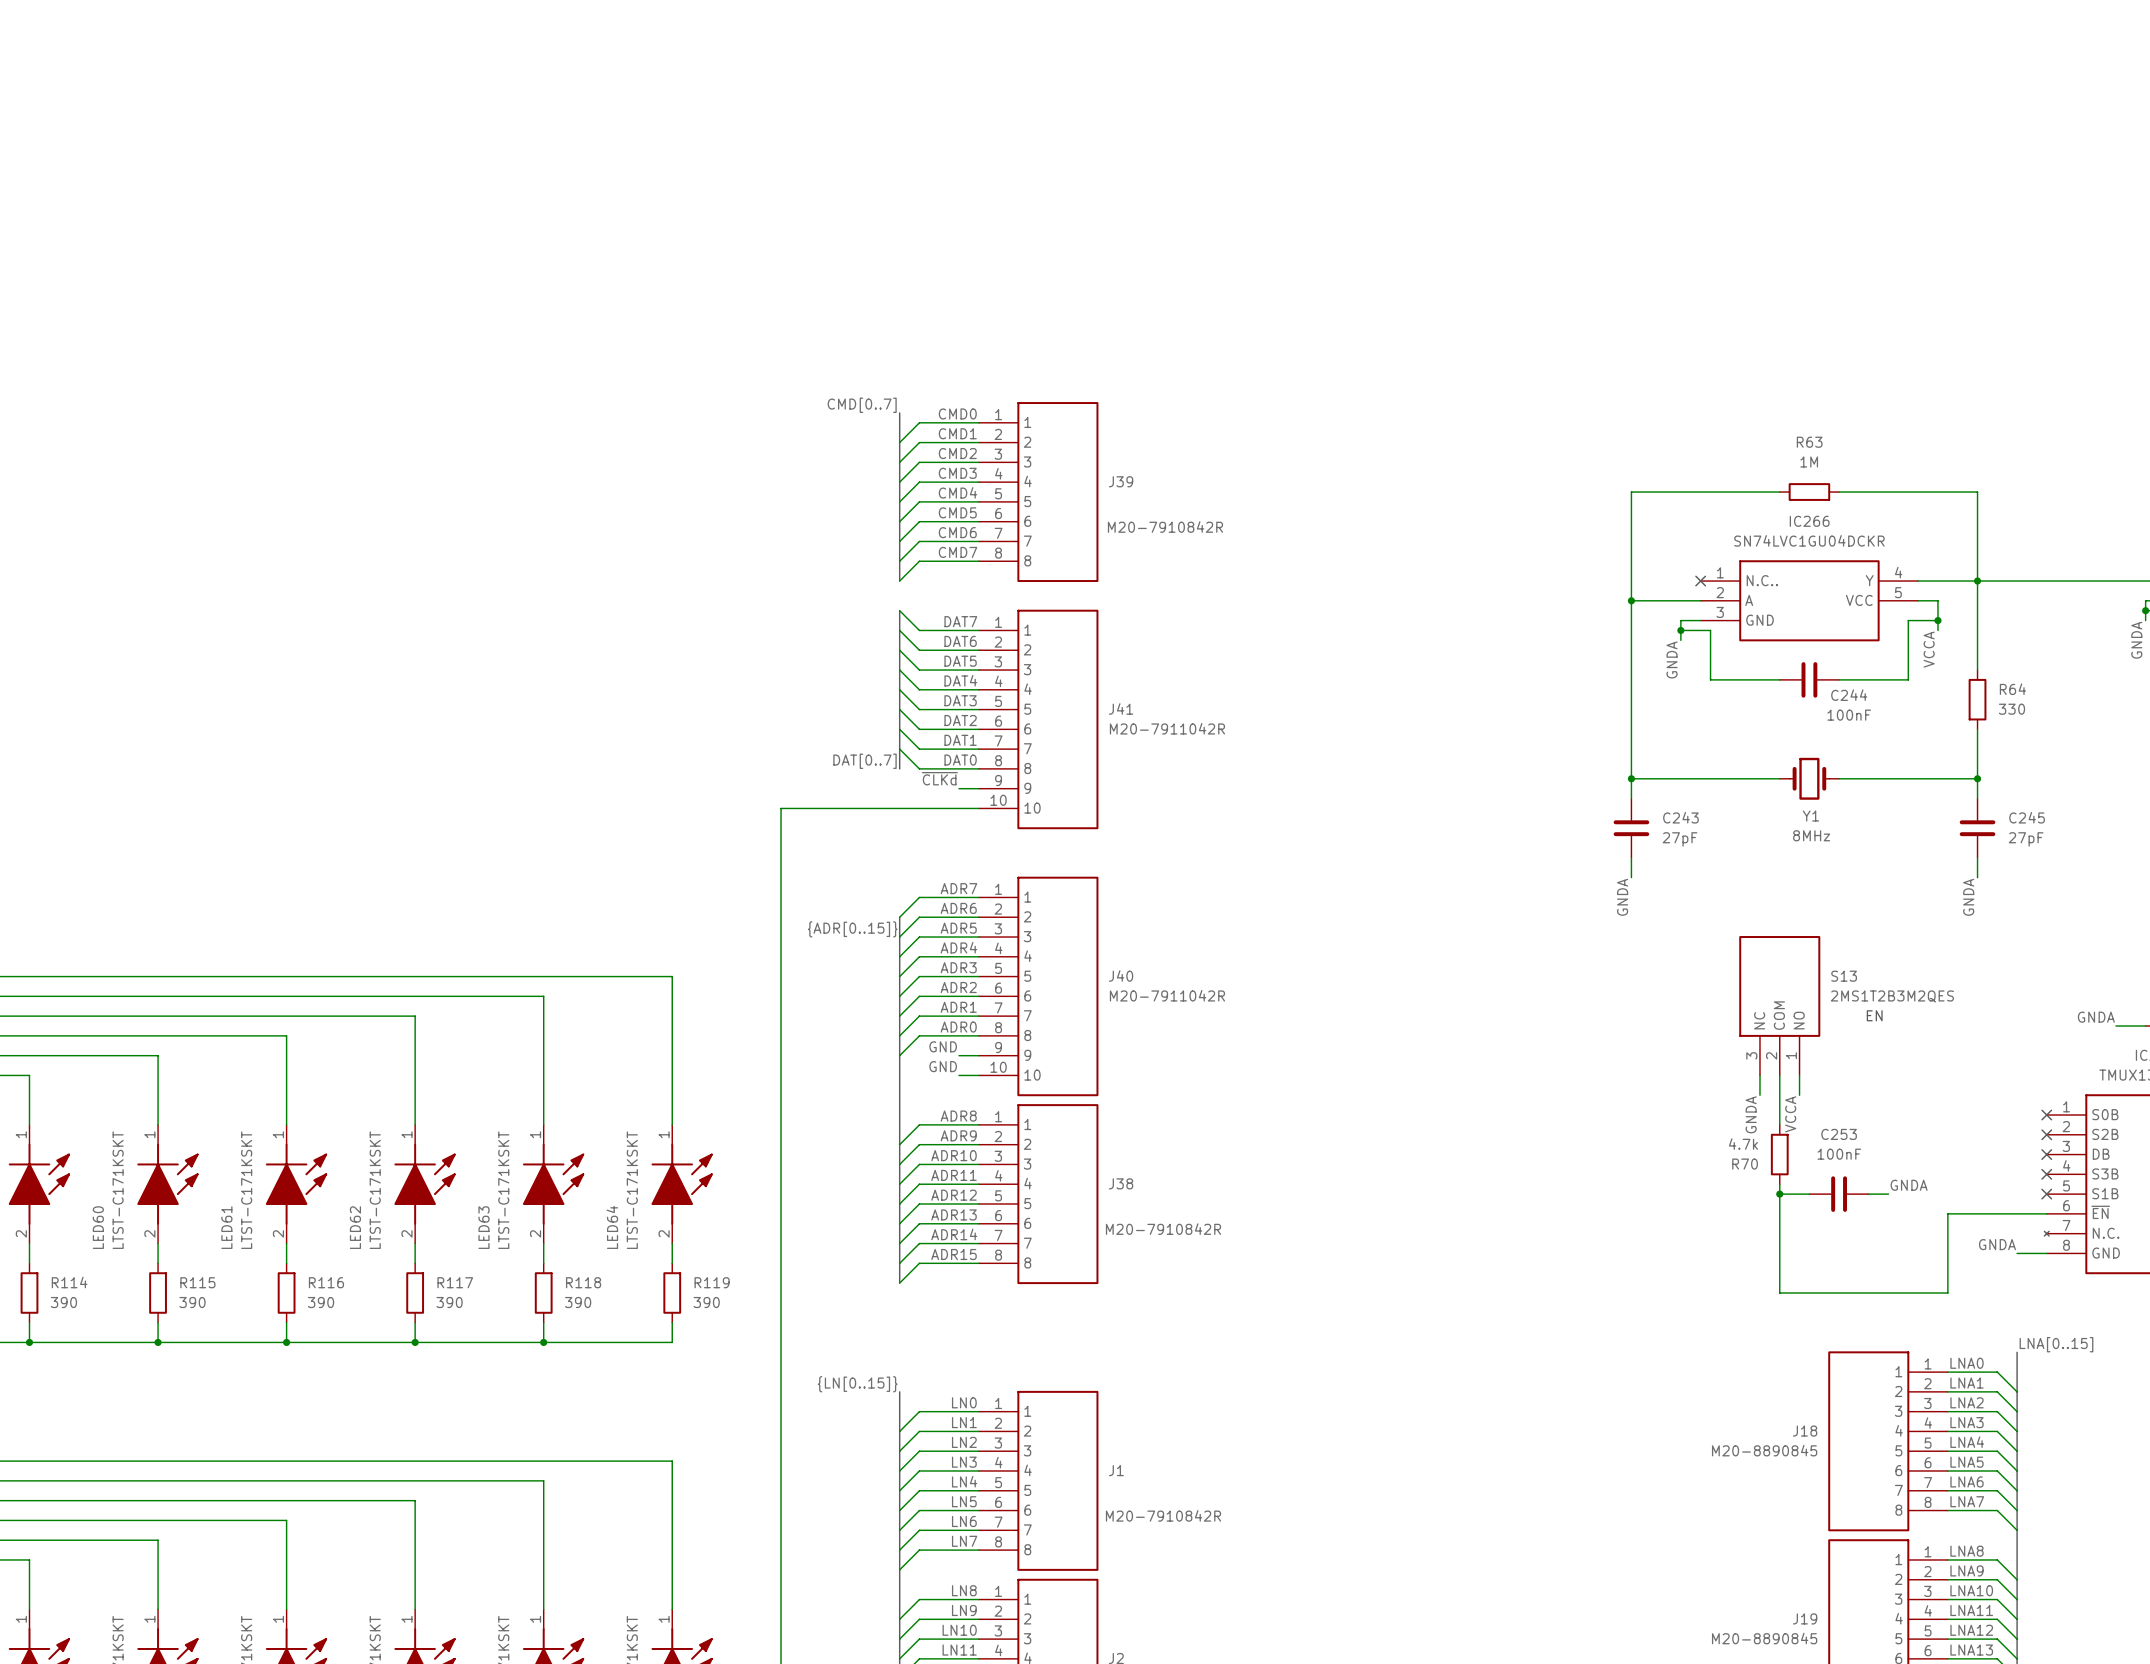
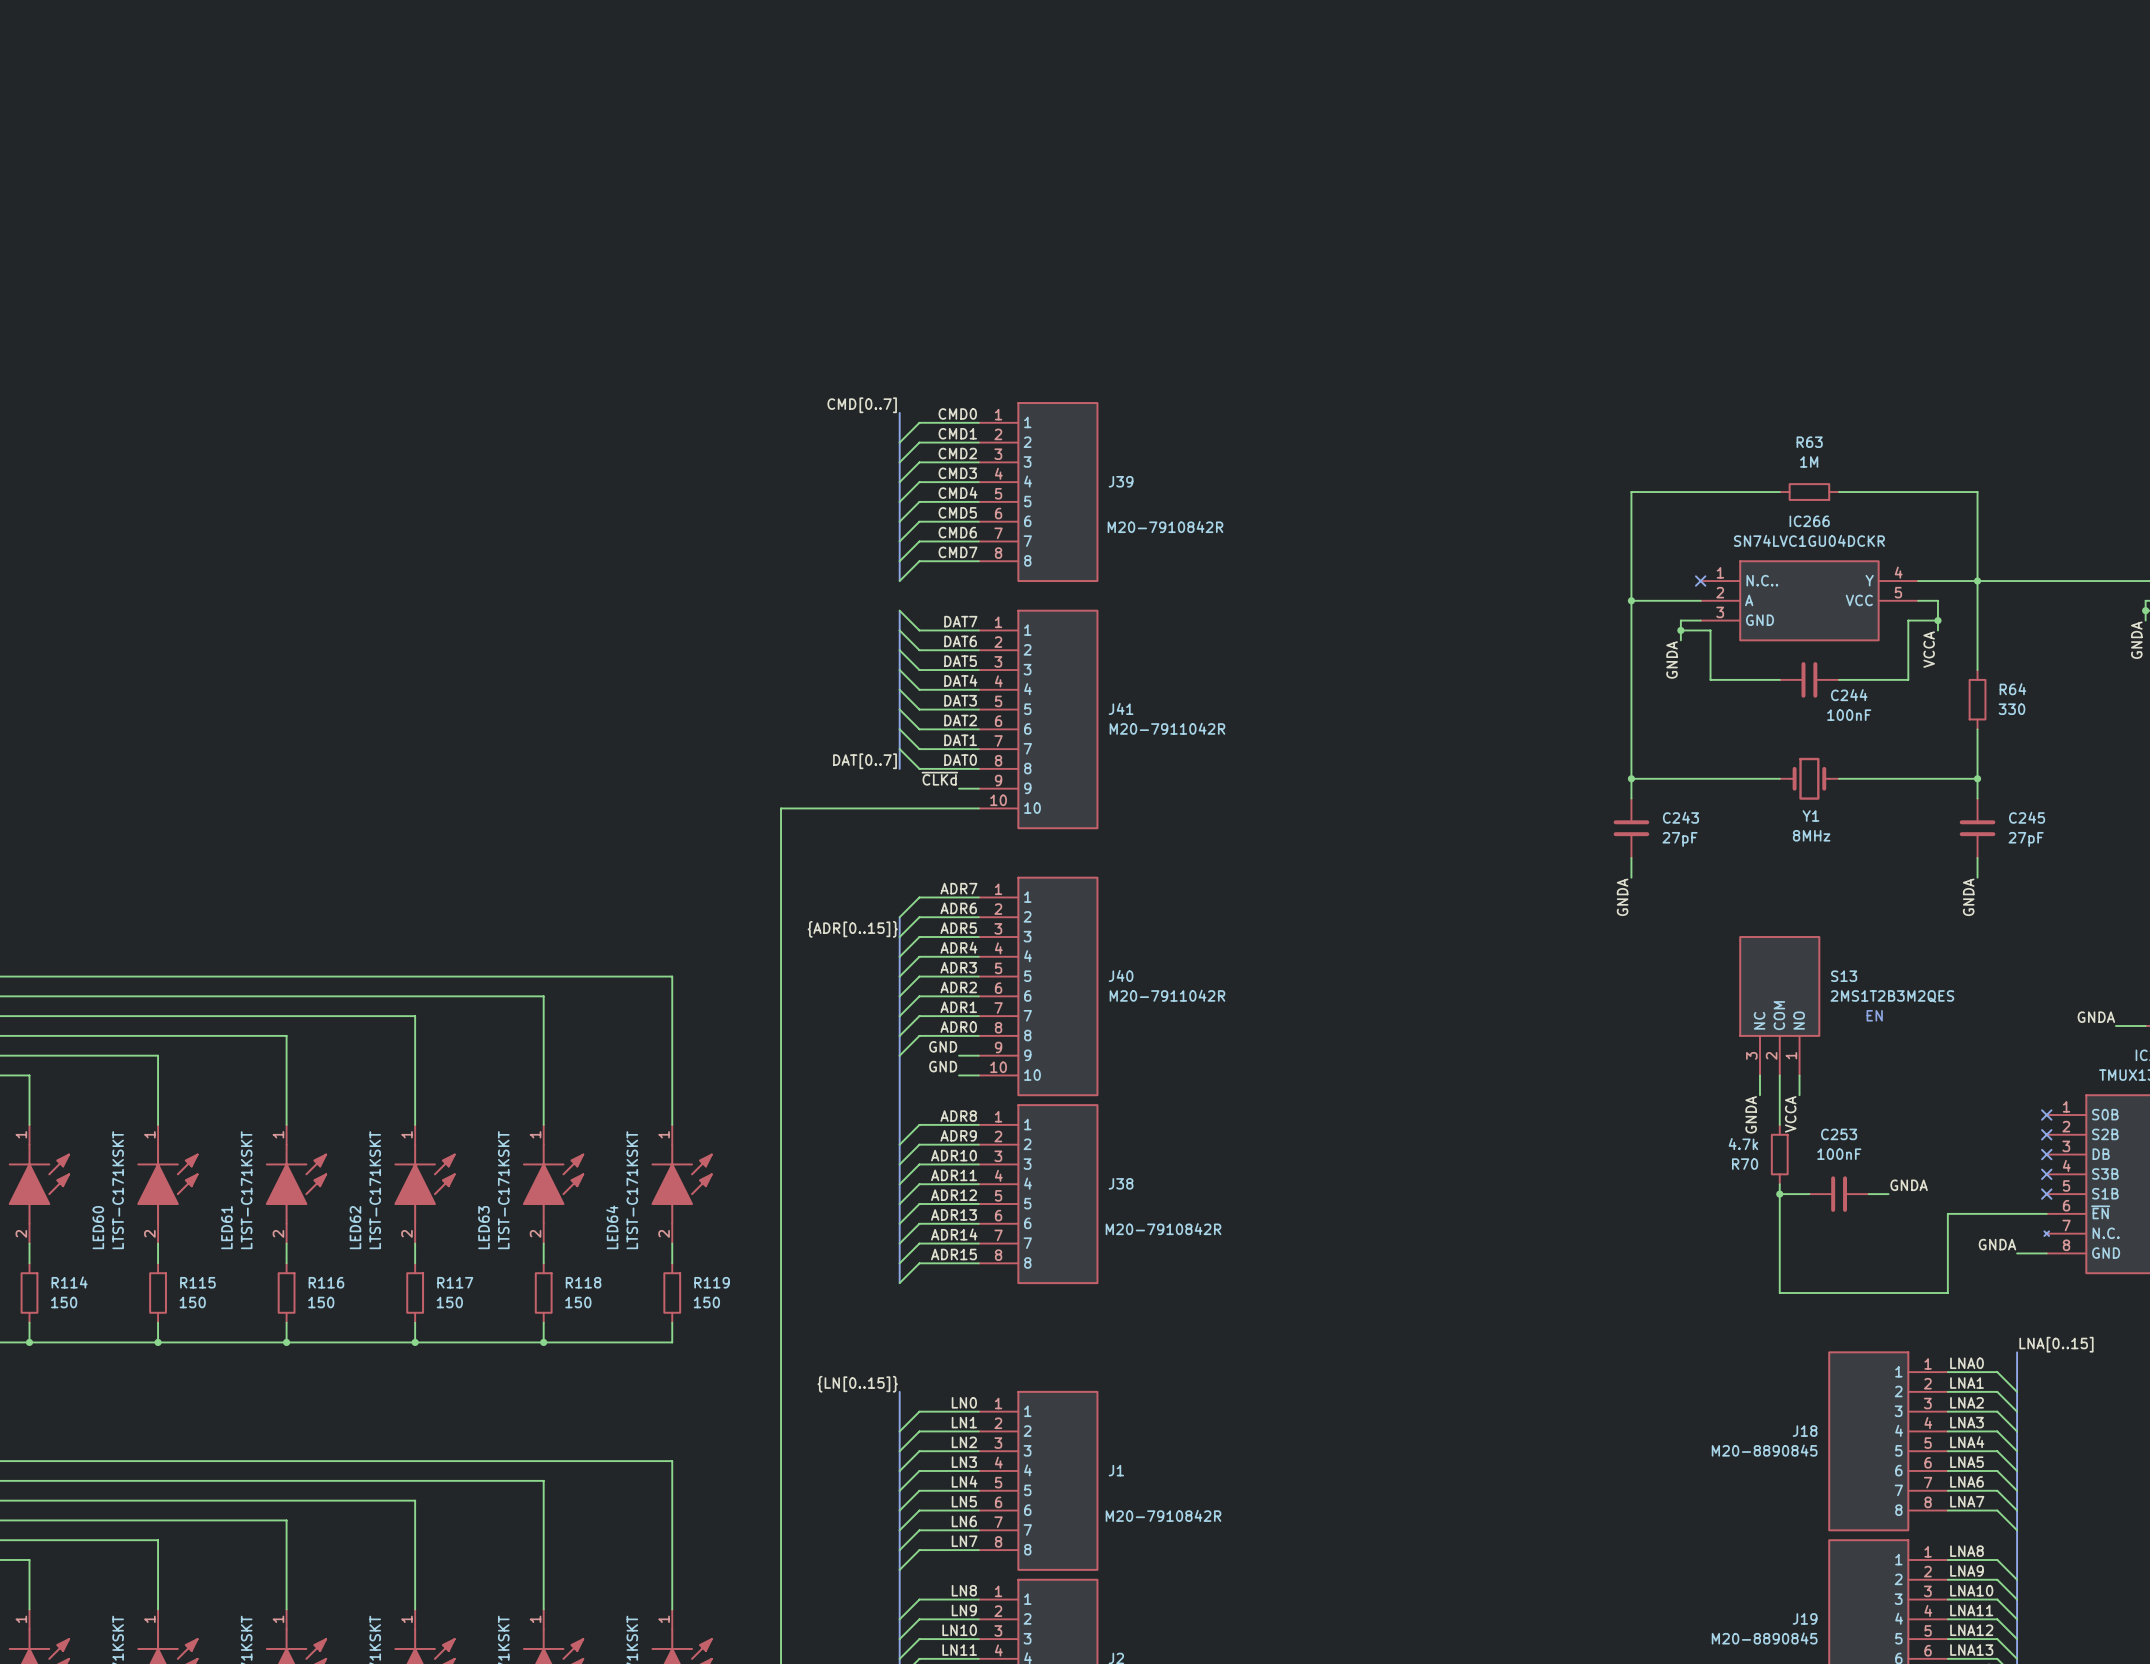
R114 value: 390 (63, 1302) -> 150 (64, 1302)
R115 value: 390 (192, 1302) -> 150 (192, 1302)
R116 value: 390 (321, 1302) -> 150 (321, 1302)
R117 value: 390 (449, 1302) -> 150 (449, 1302)
R118 value: 390 (578, 1302) -> 150 (578, 1302)
R119 value: 390 (706, 1302) -> 150 (706, 1302)

